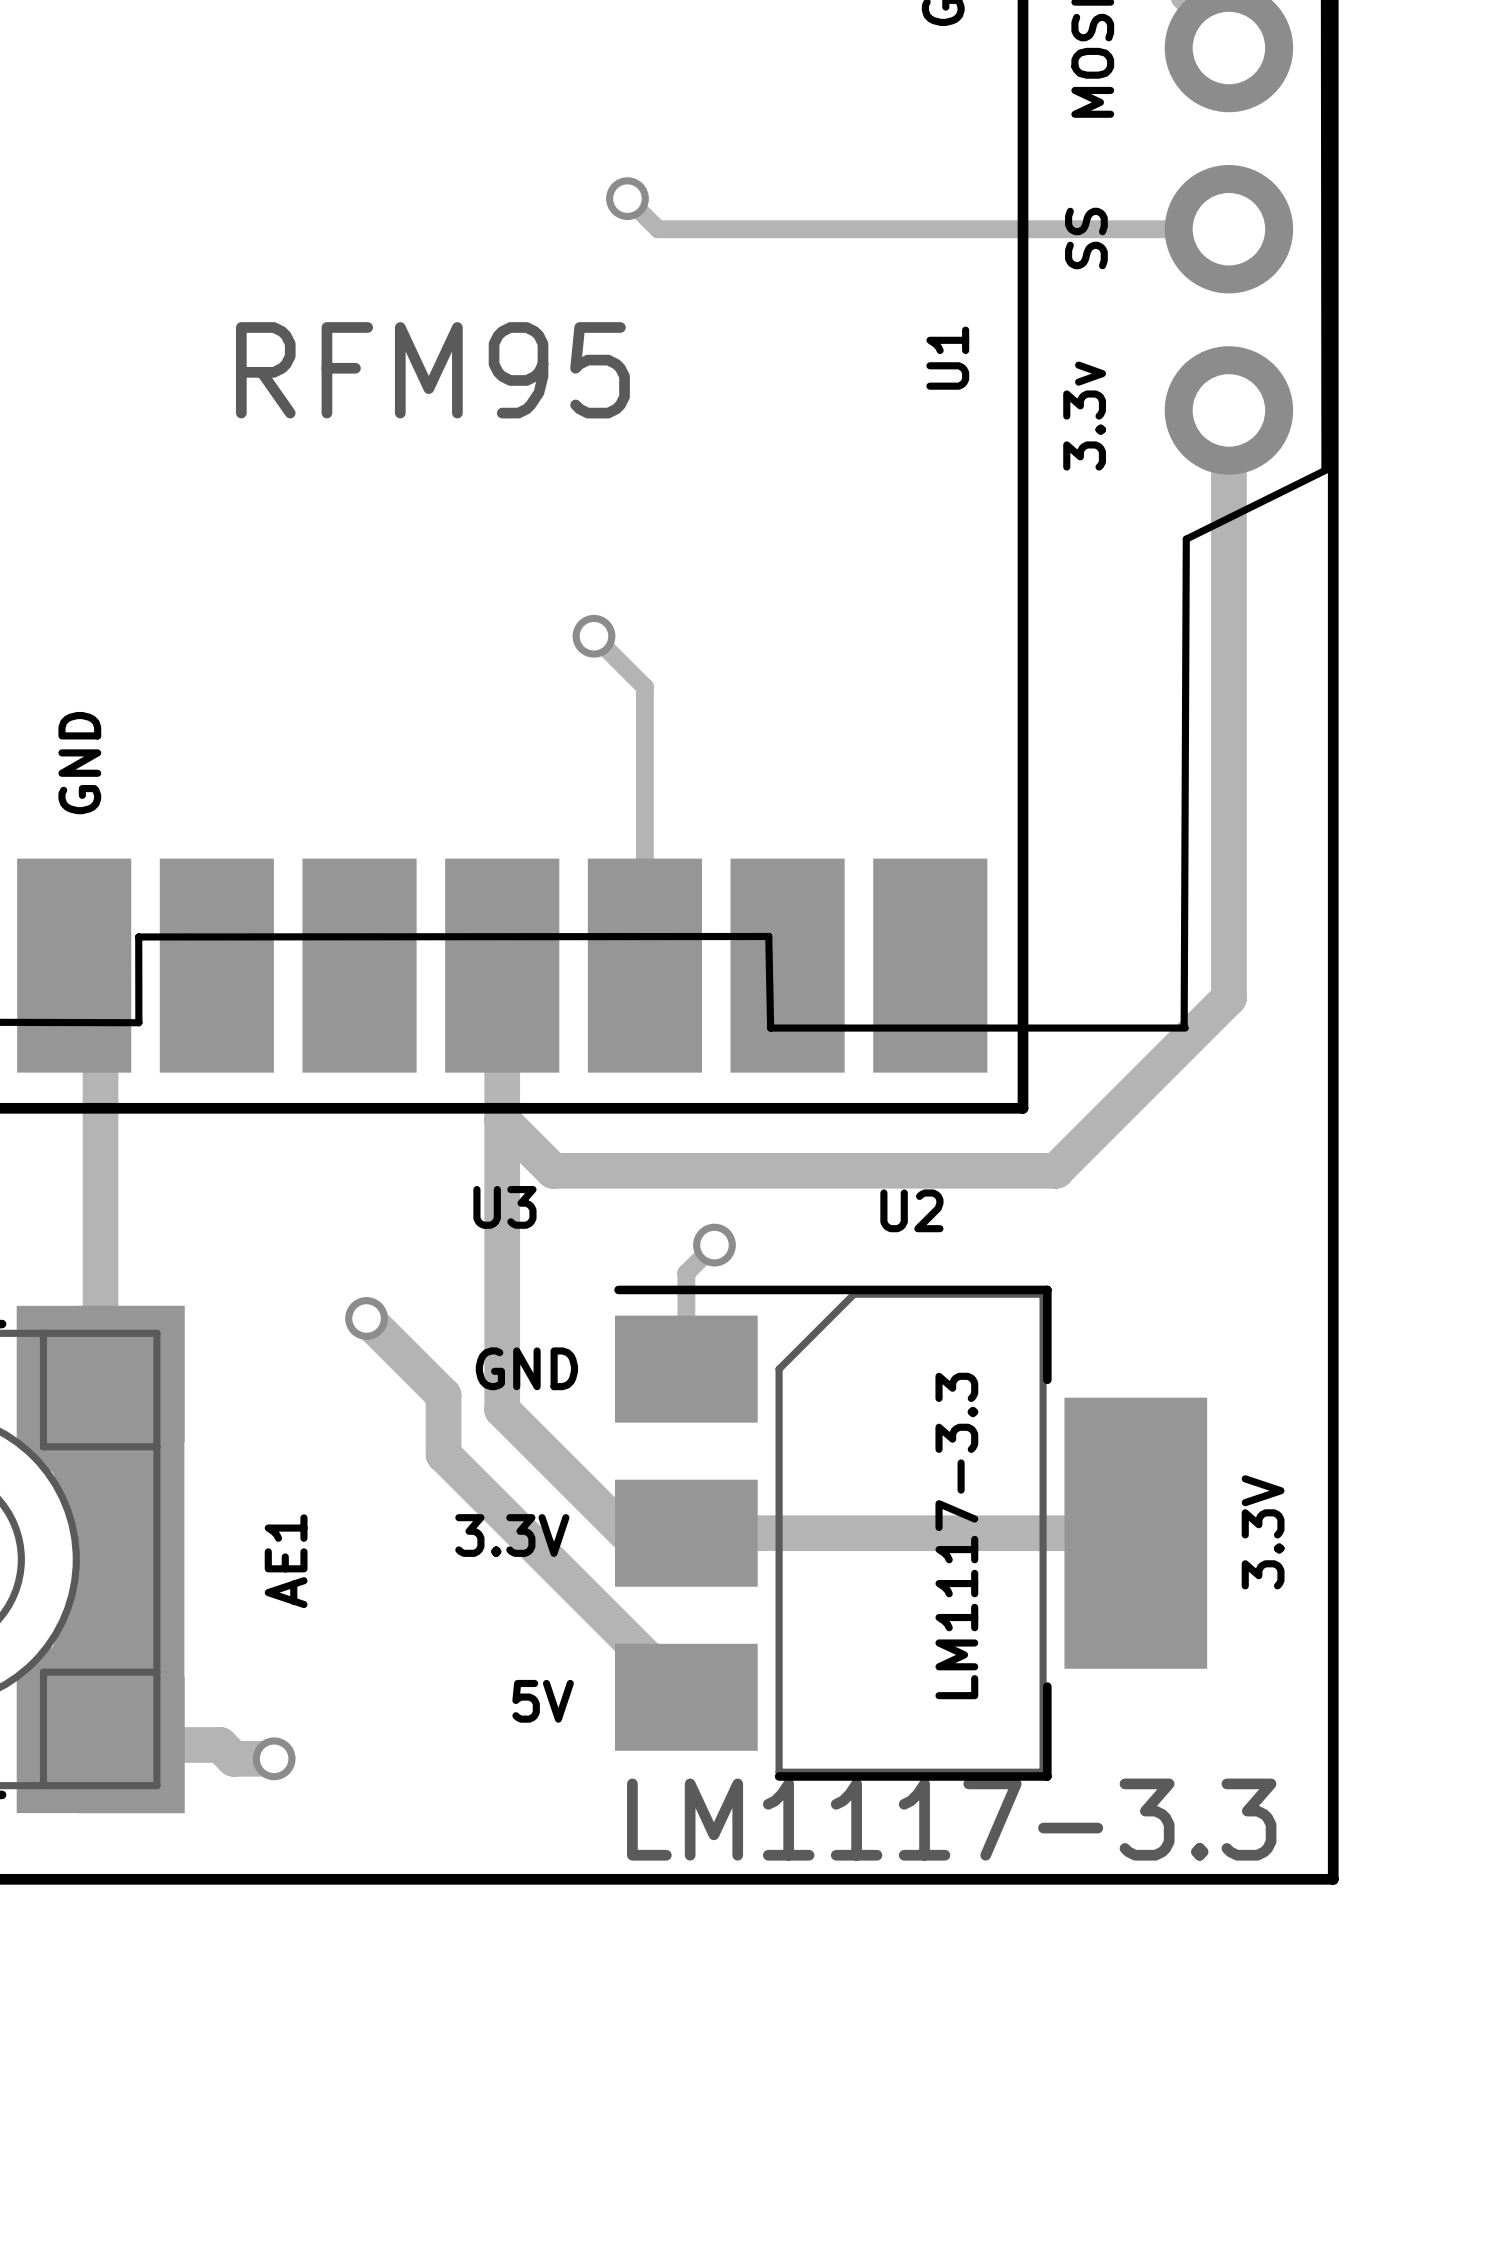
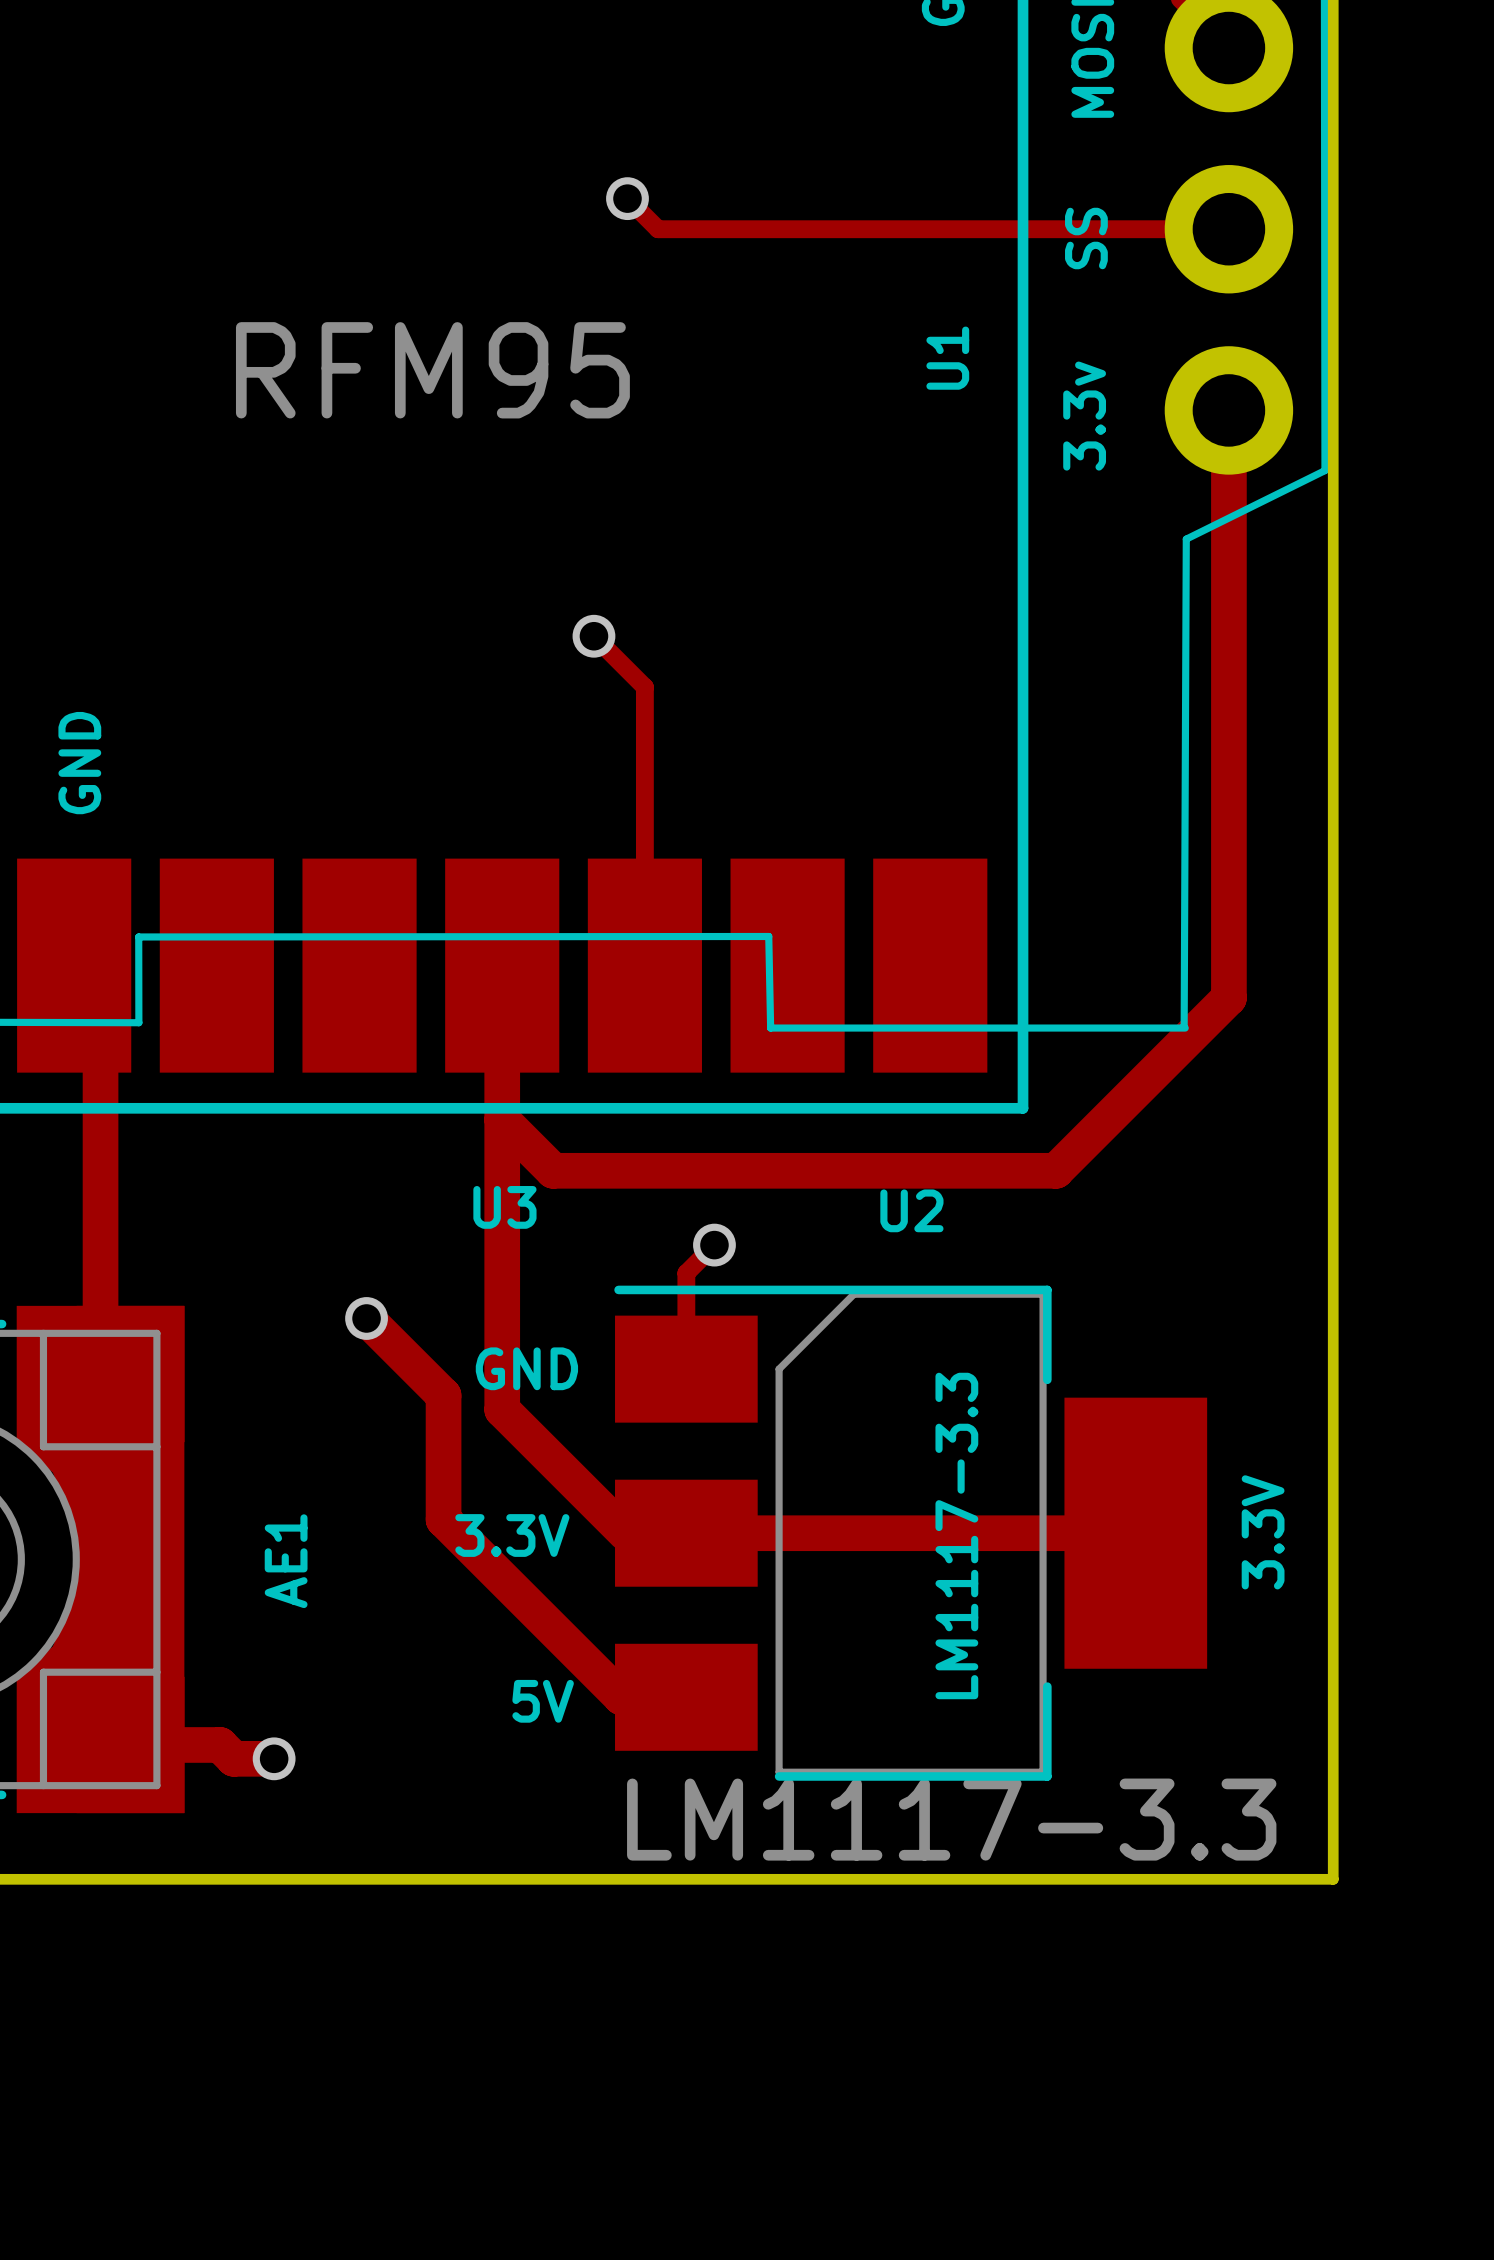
track: (443, 1454) (686, 1697) -> (443, 1454) (443, 1519) (621, 1697) (686, 1697)

